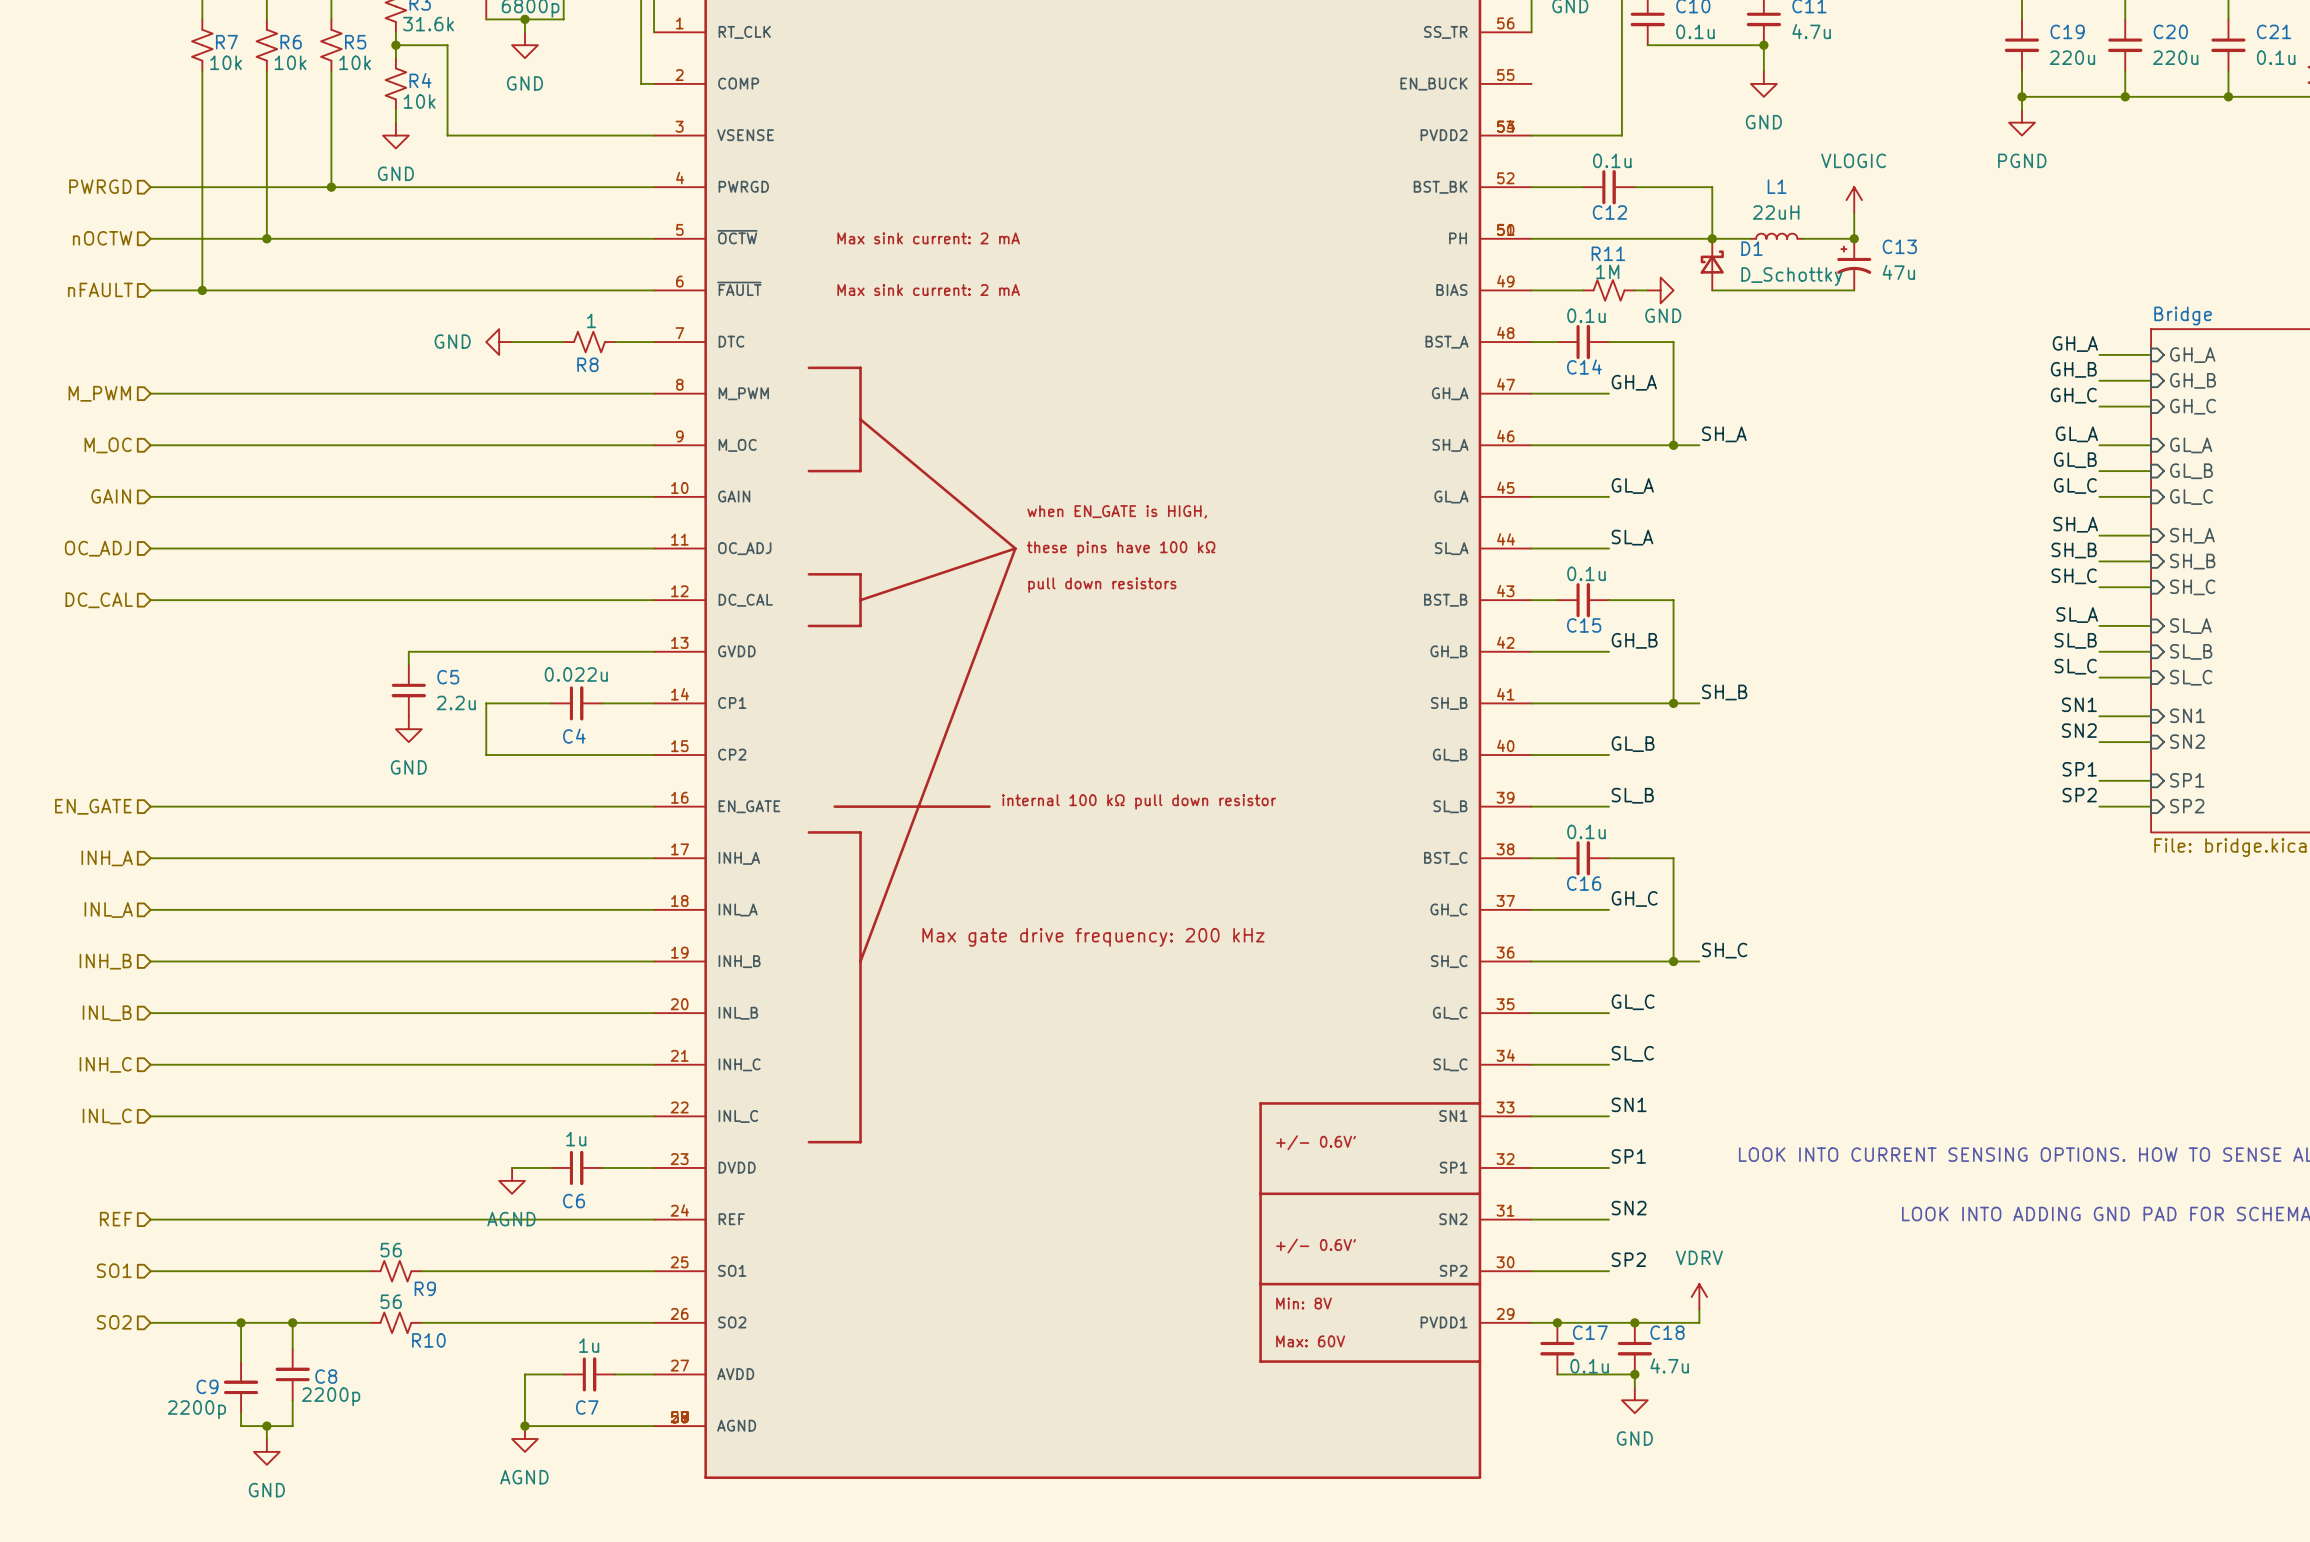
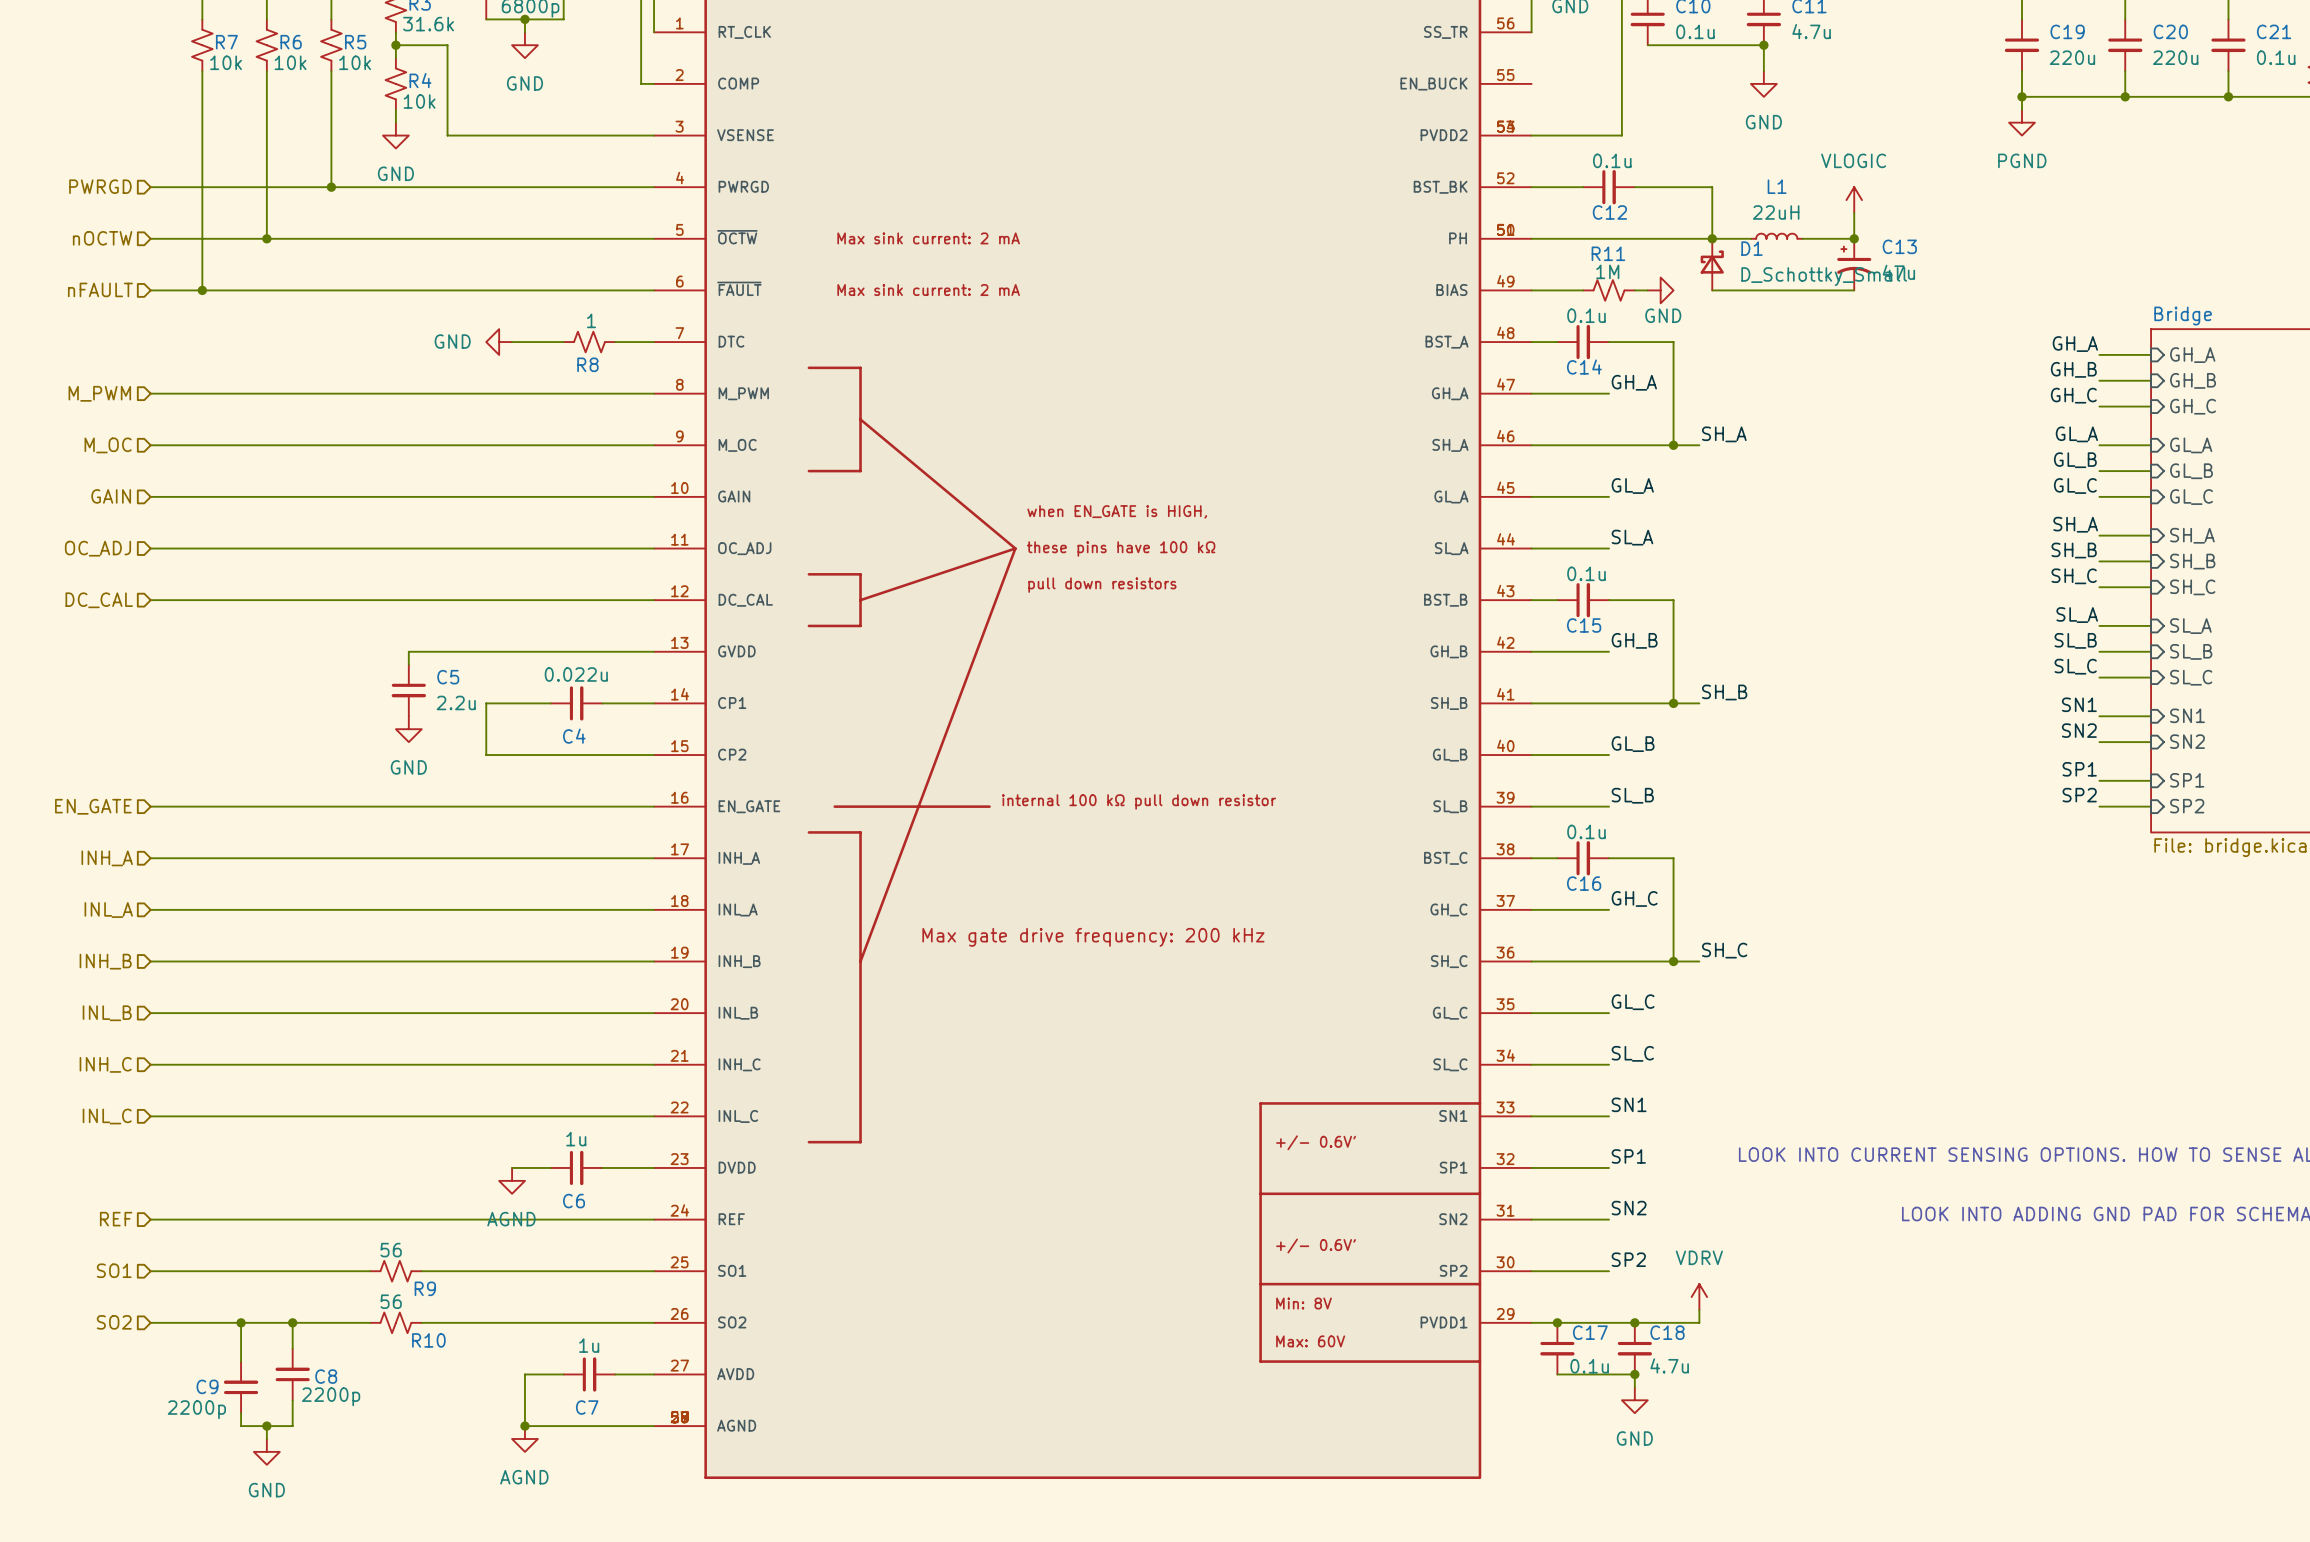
D1 value: D_Schottky (1791, 276) -> D_Schottky_Small (1824, 276)

